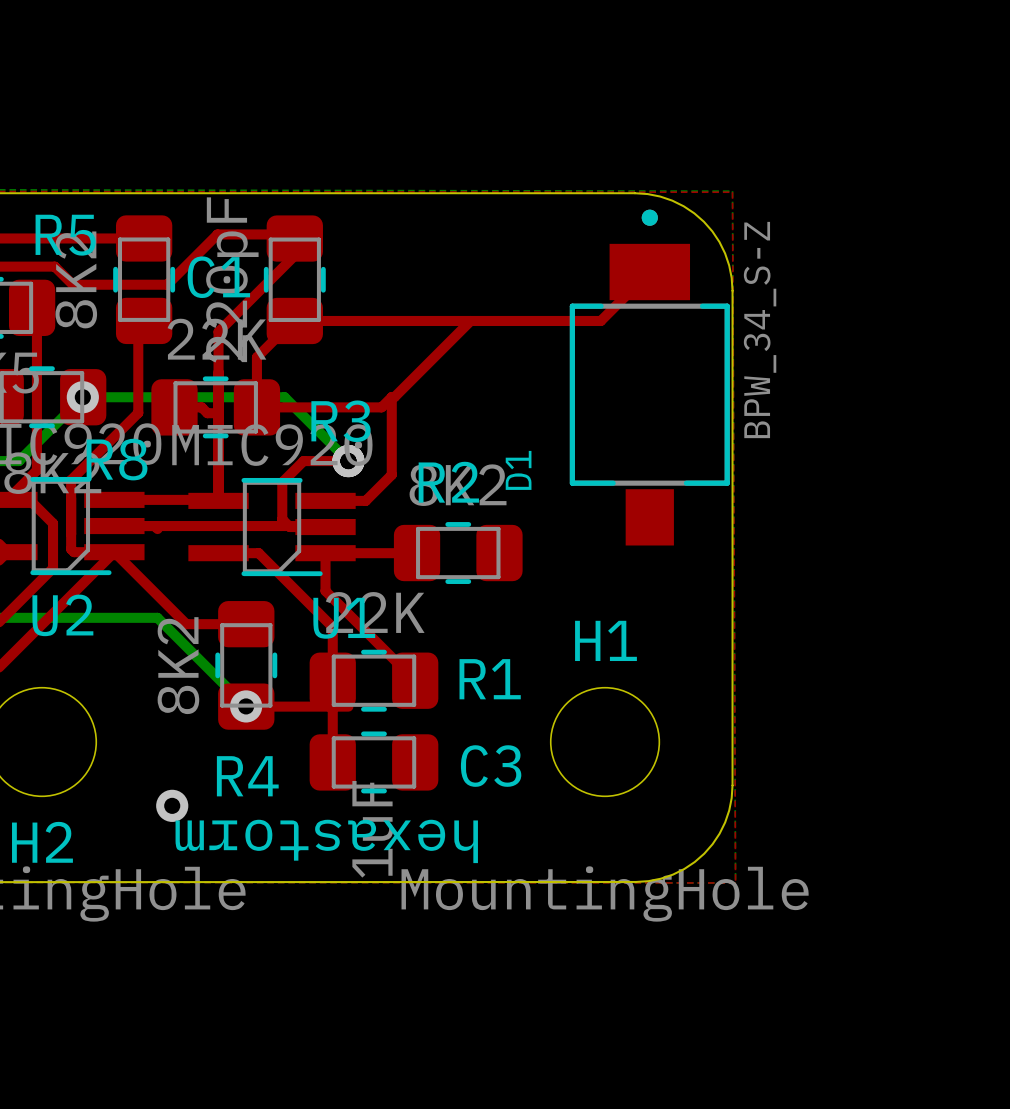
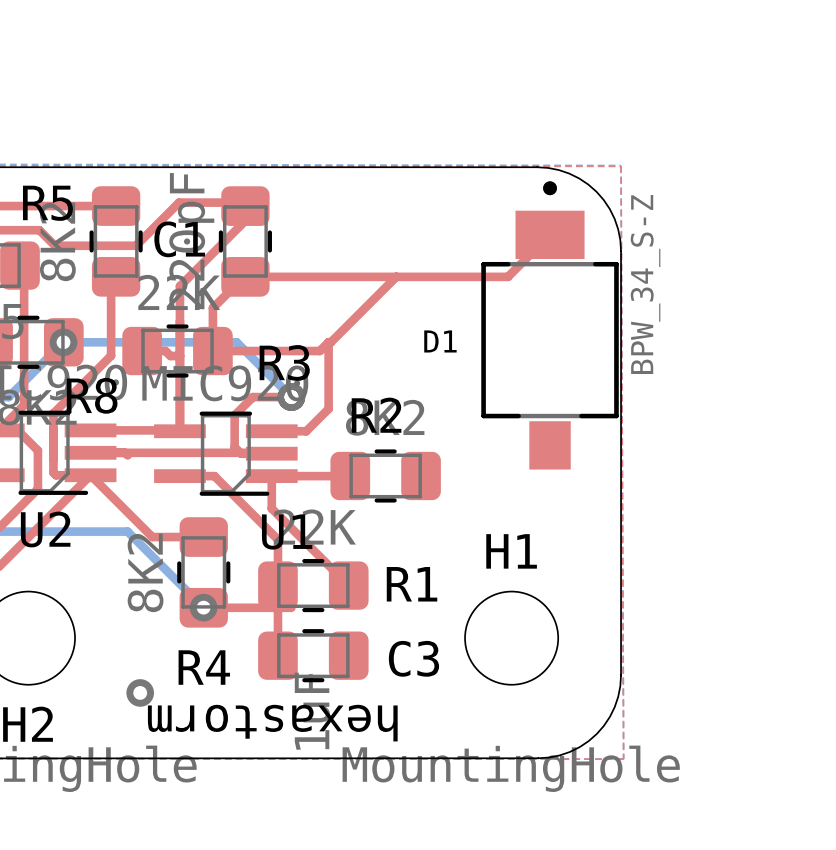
D1 name rotation: 0° (518, 470) -> 90° clockwise (440, 341)
D1 name position: D1 (518, 470) -> D1 (440, 341)

